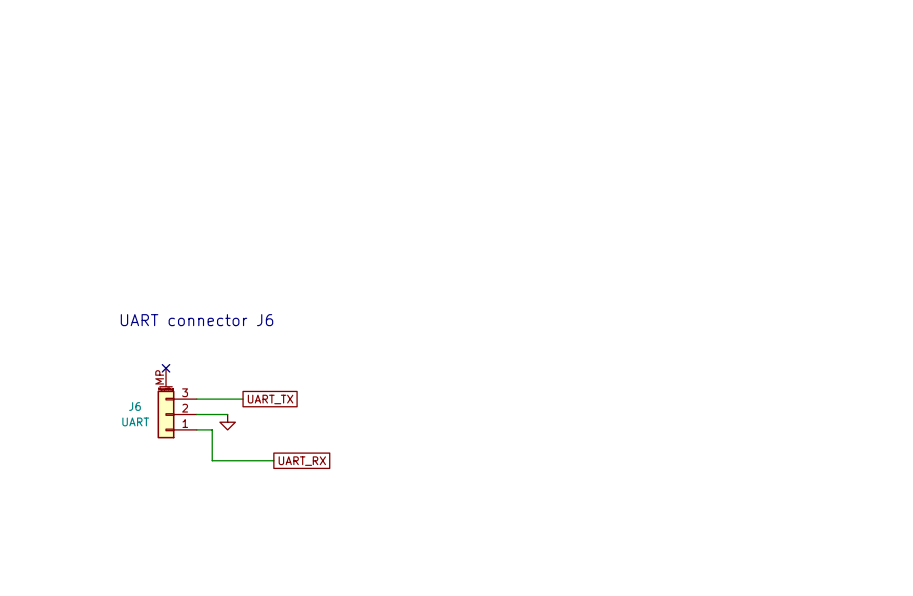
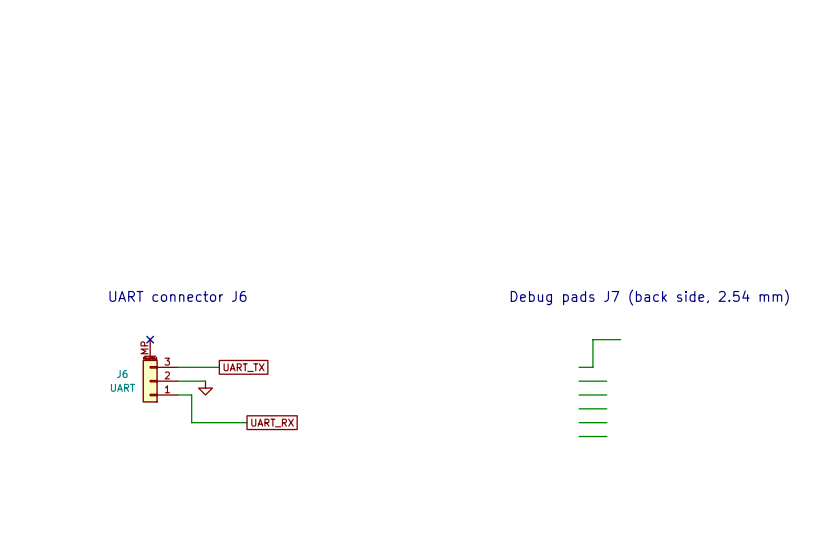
text: none -> Debug pads J7 (back side, 2.54 mm) (649, 297)
wire: none -> (620, 339) (592, 339) (592, 367) (579, 367)
wire: none -> (579, 381) (606, 381)
wire: none -> (579, 395) (606, 395)
wire: none -> (579, 408) (606, 408)
wire: none -> (579, 422) (606, 422)
wire: none -> (579, 436) (606, 436)

